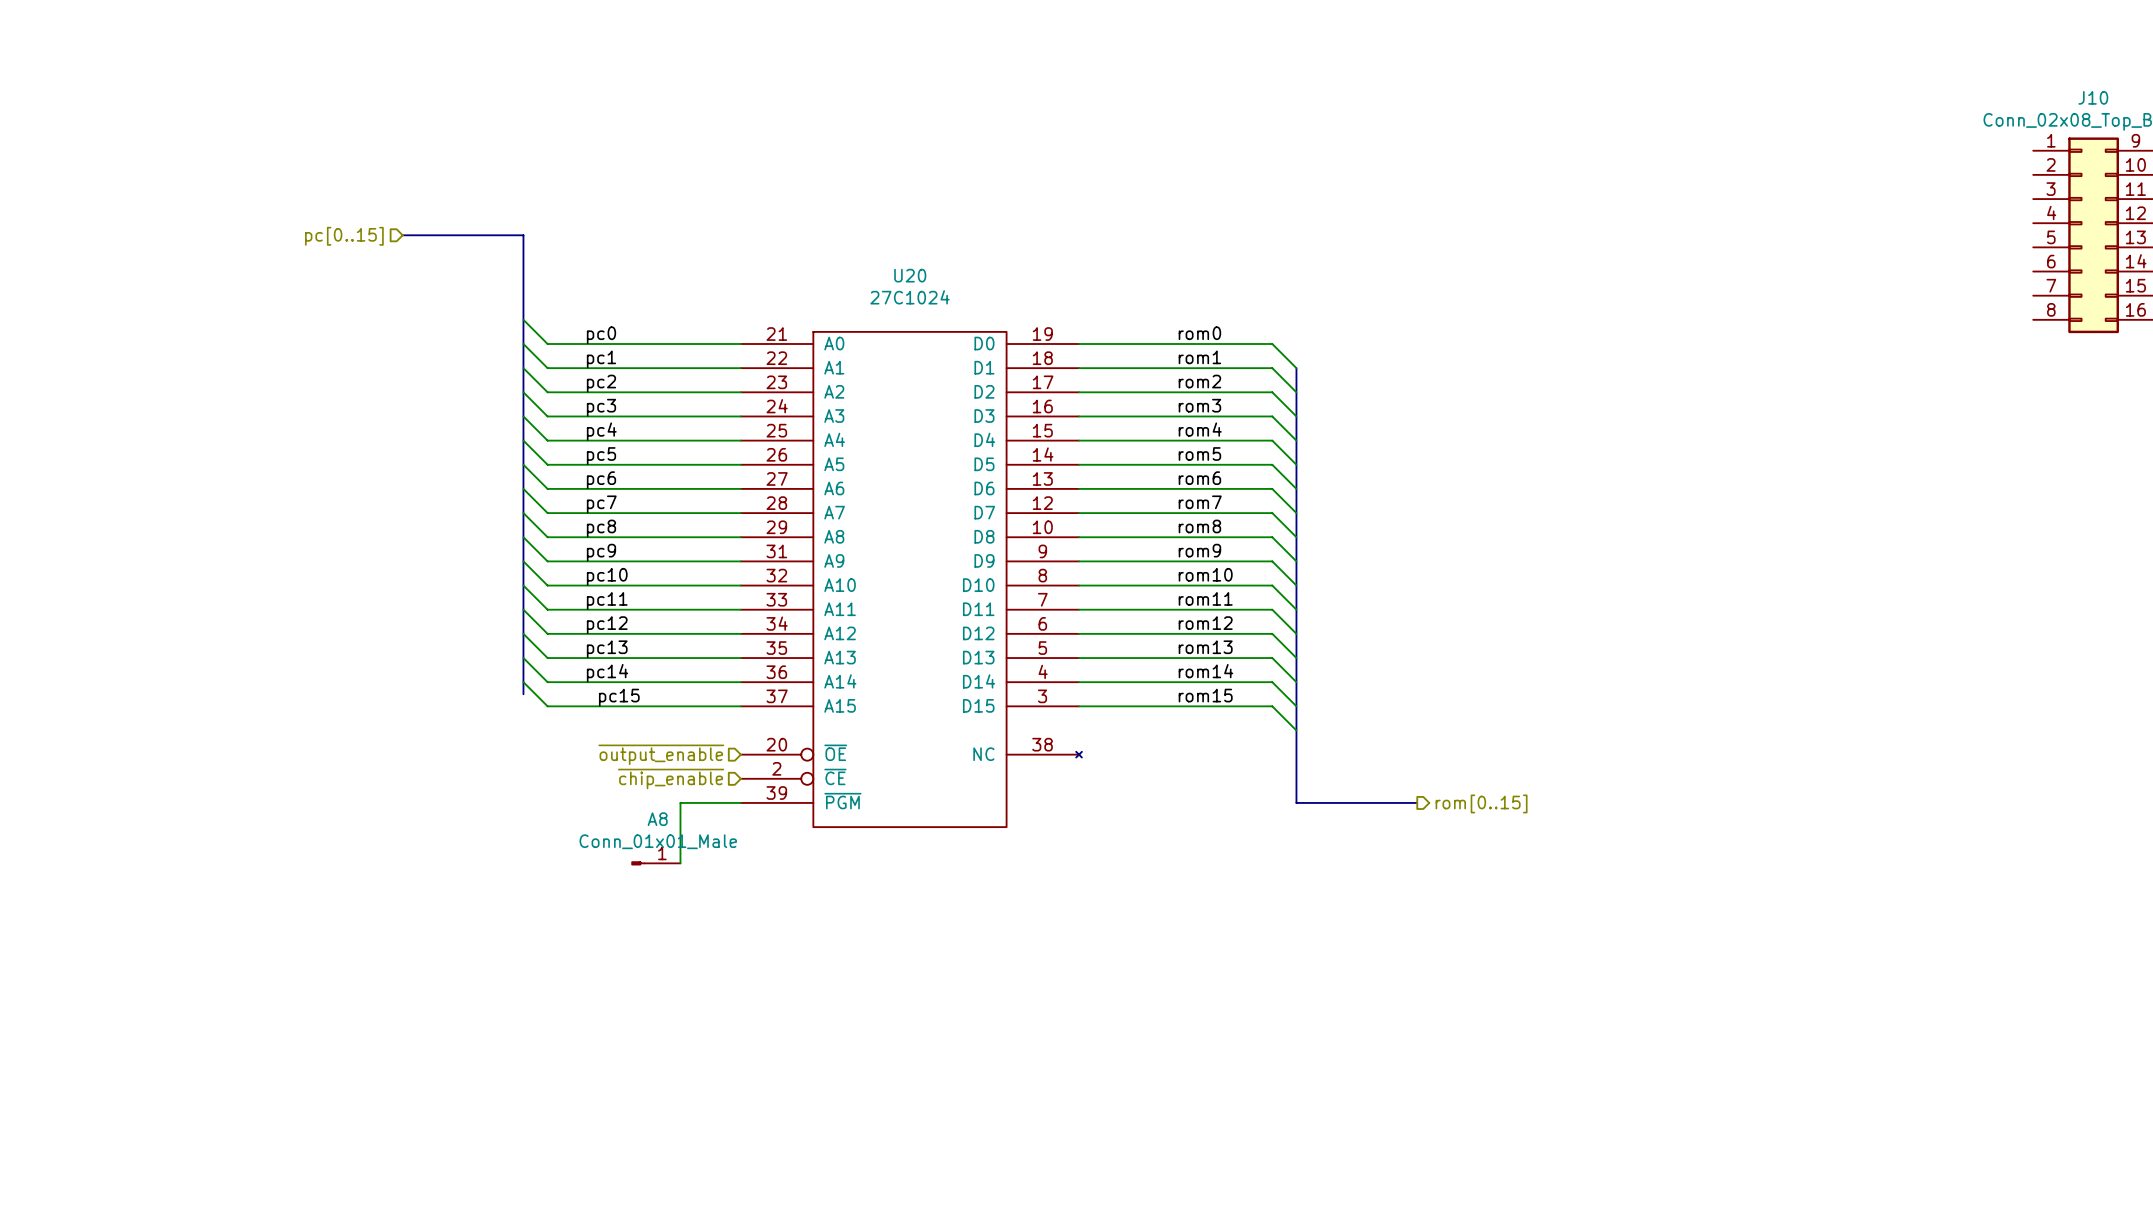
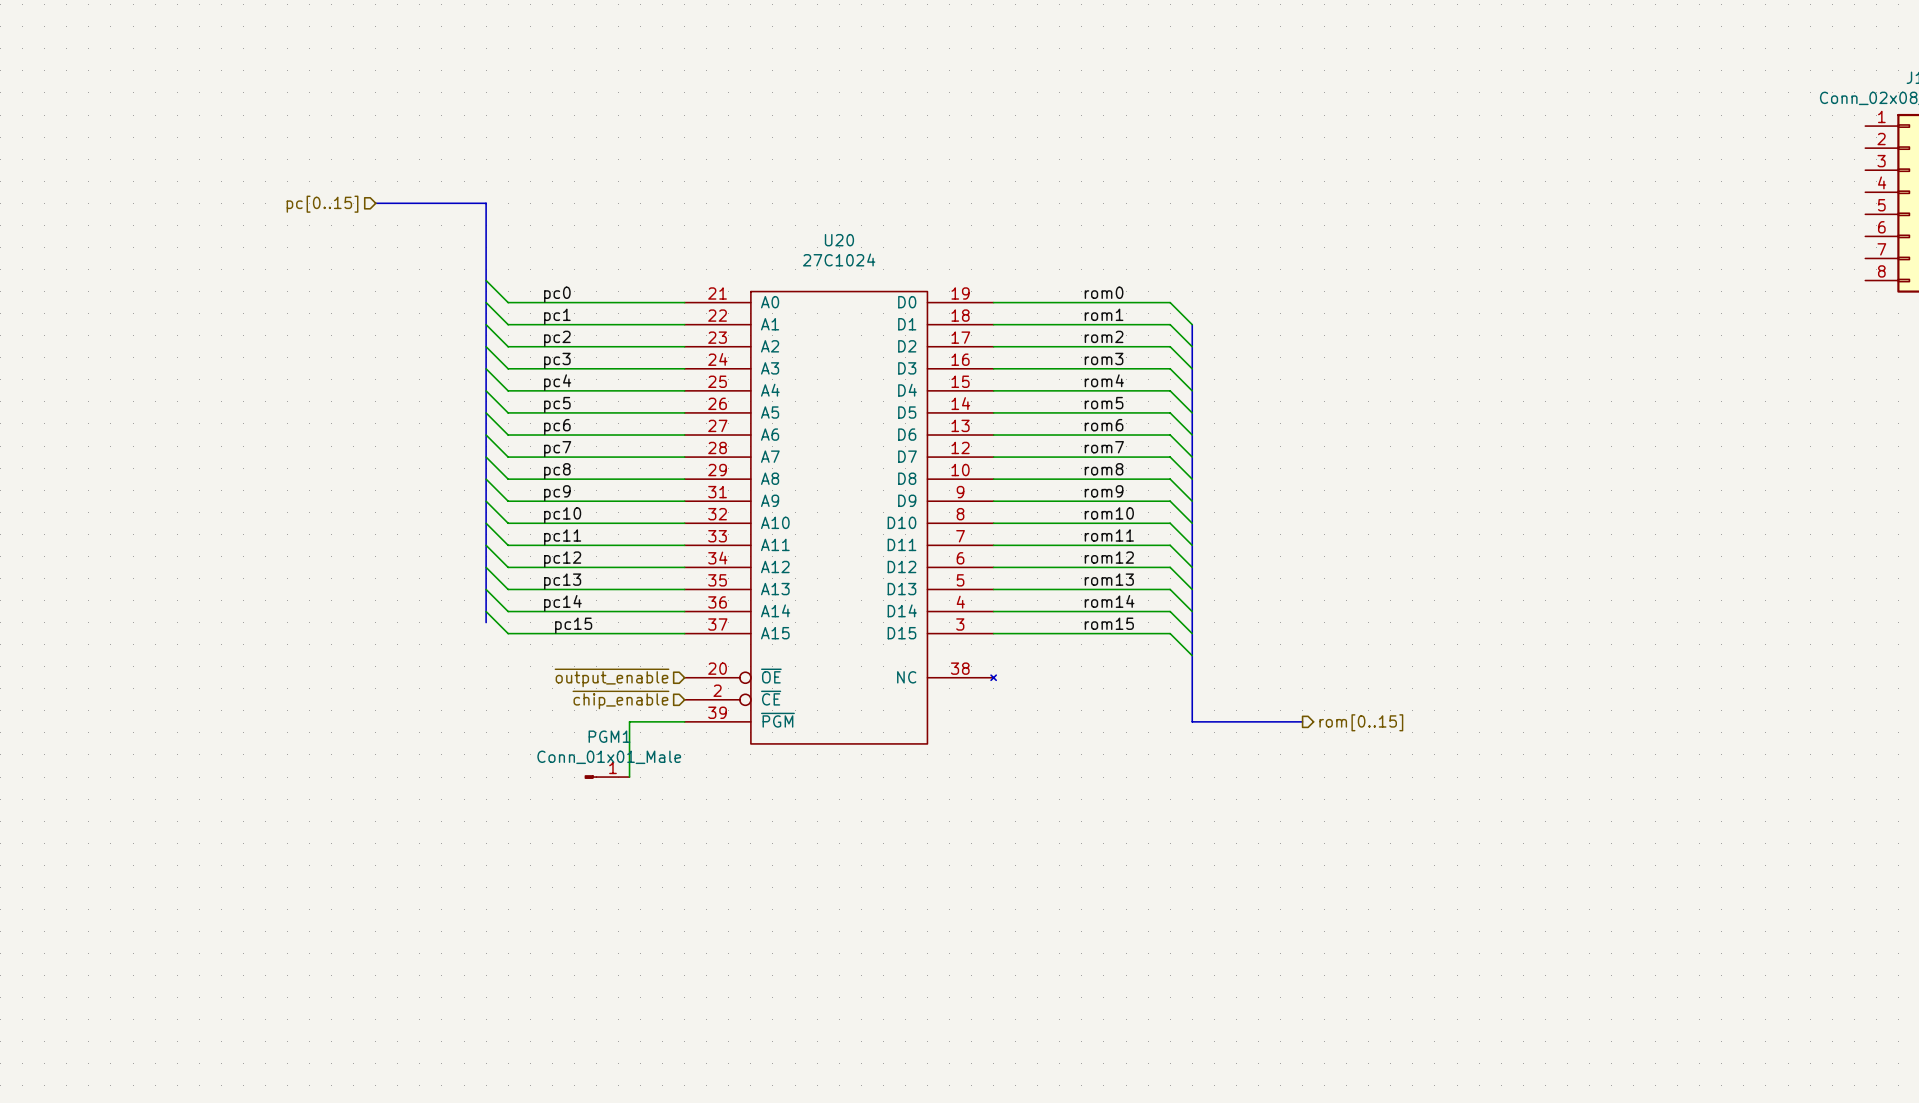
A8 name: A8 (657, 819) -> PGM1 (609, 736)

